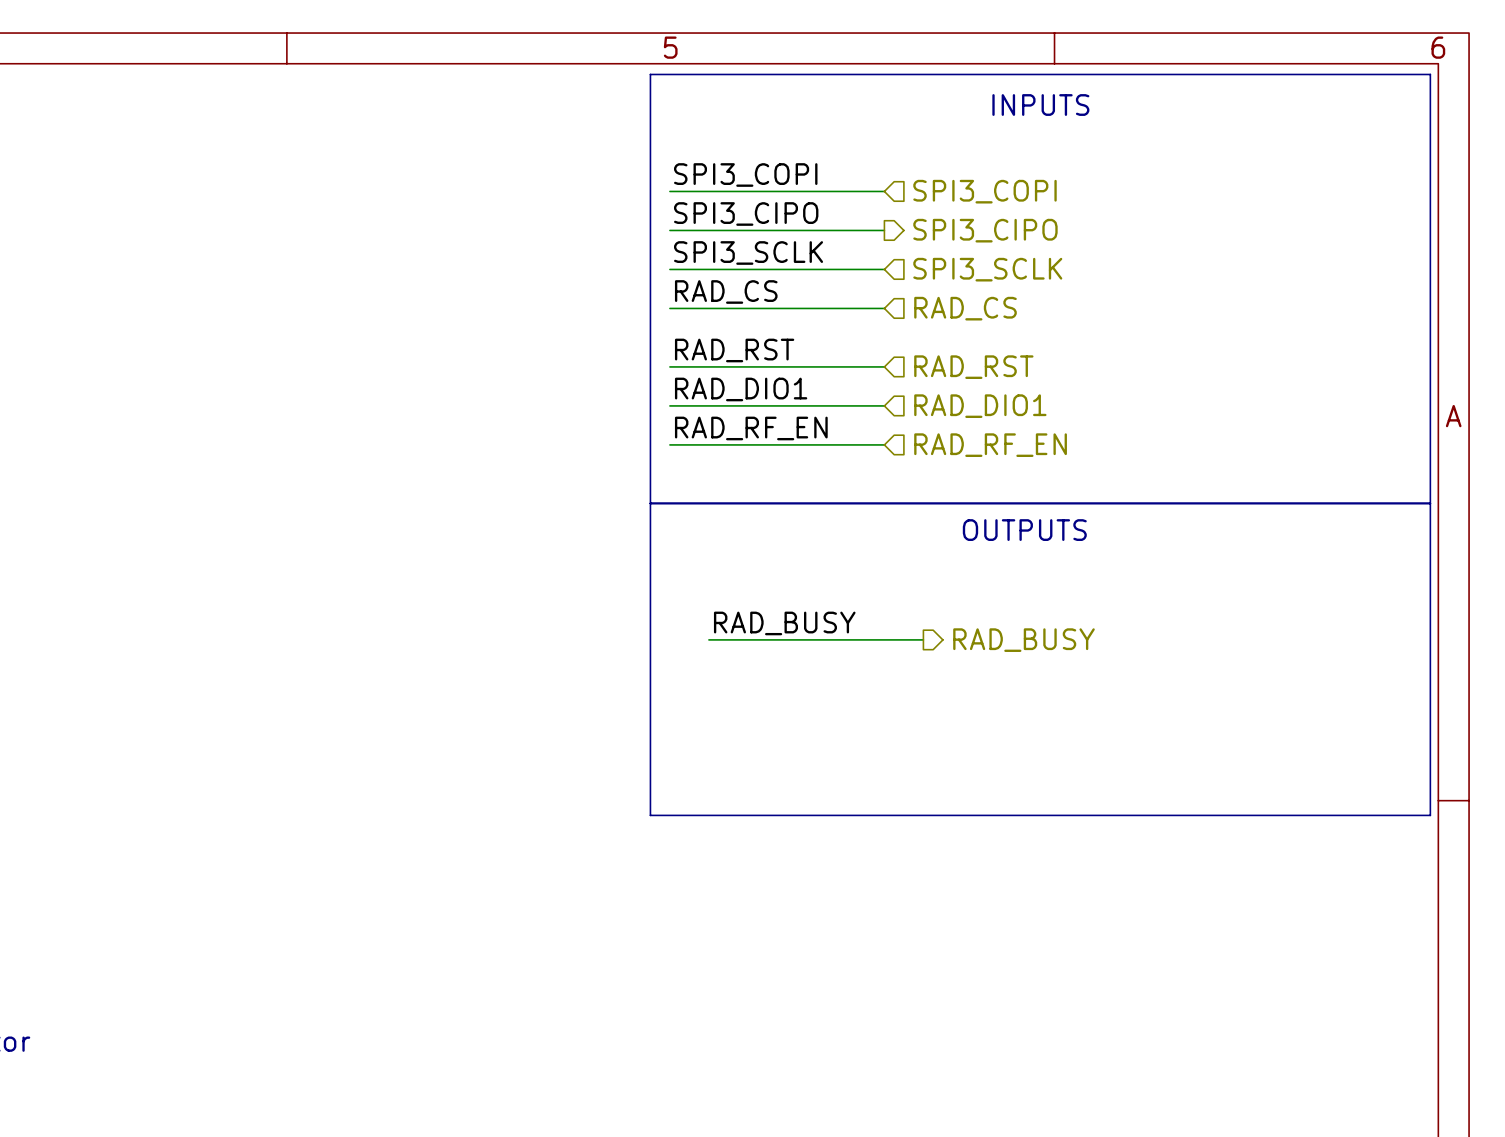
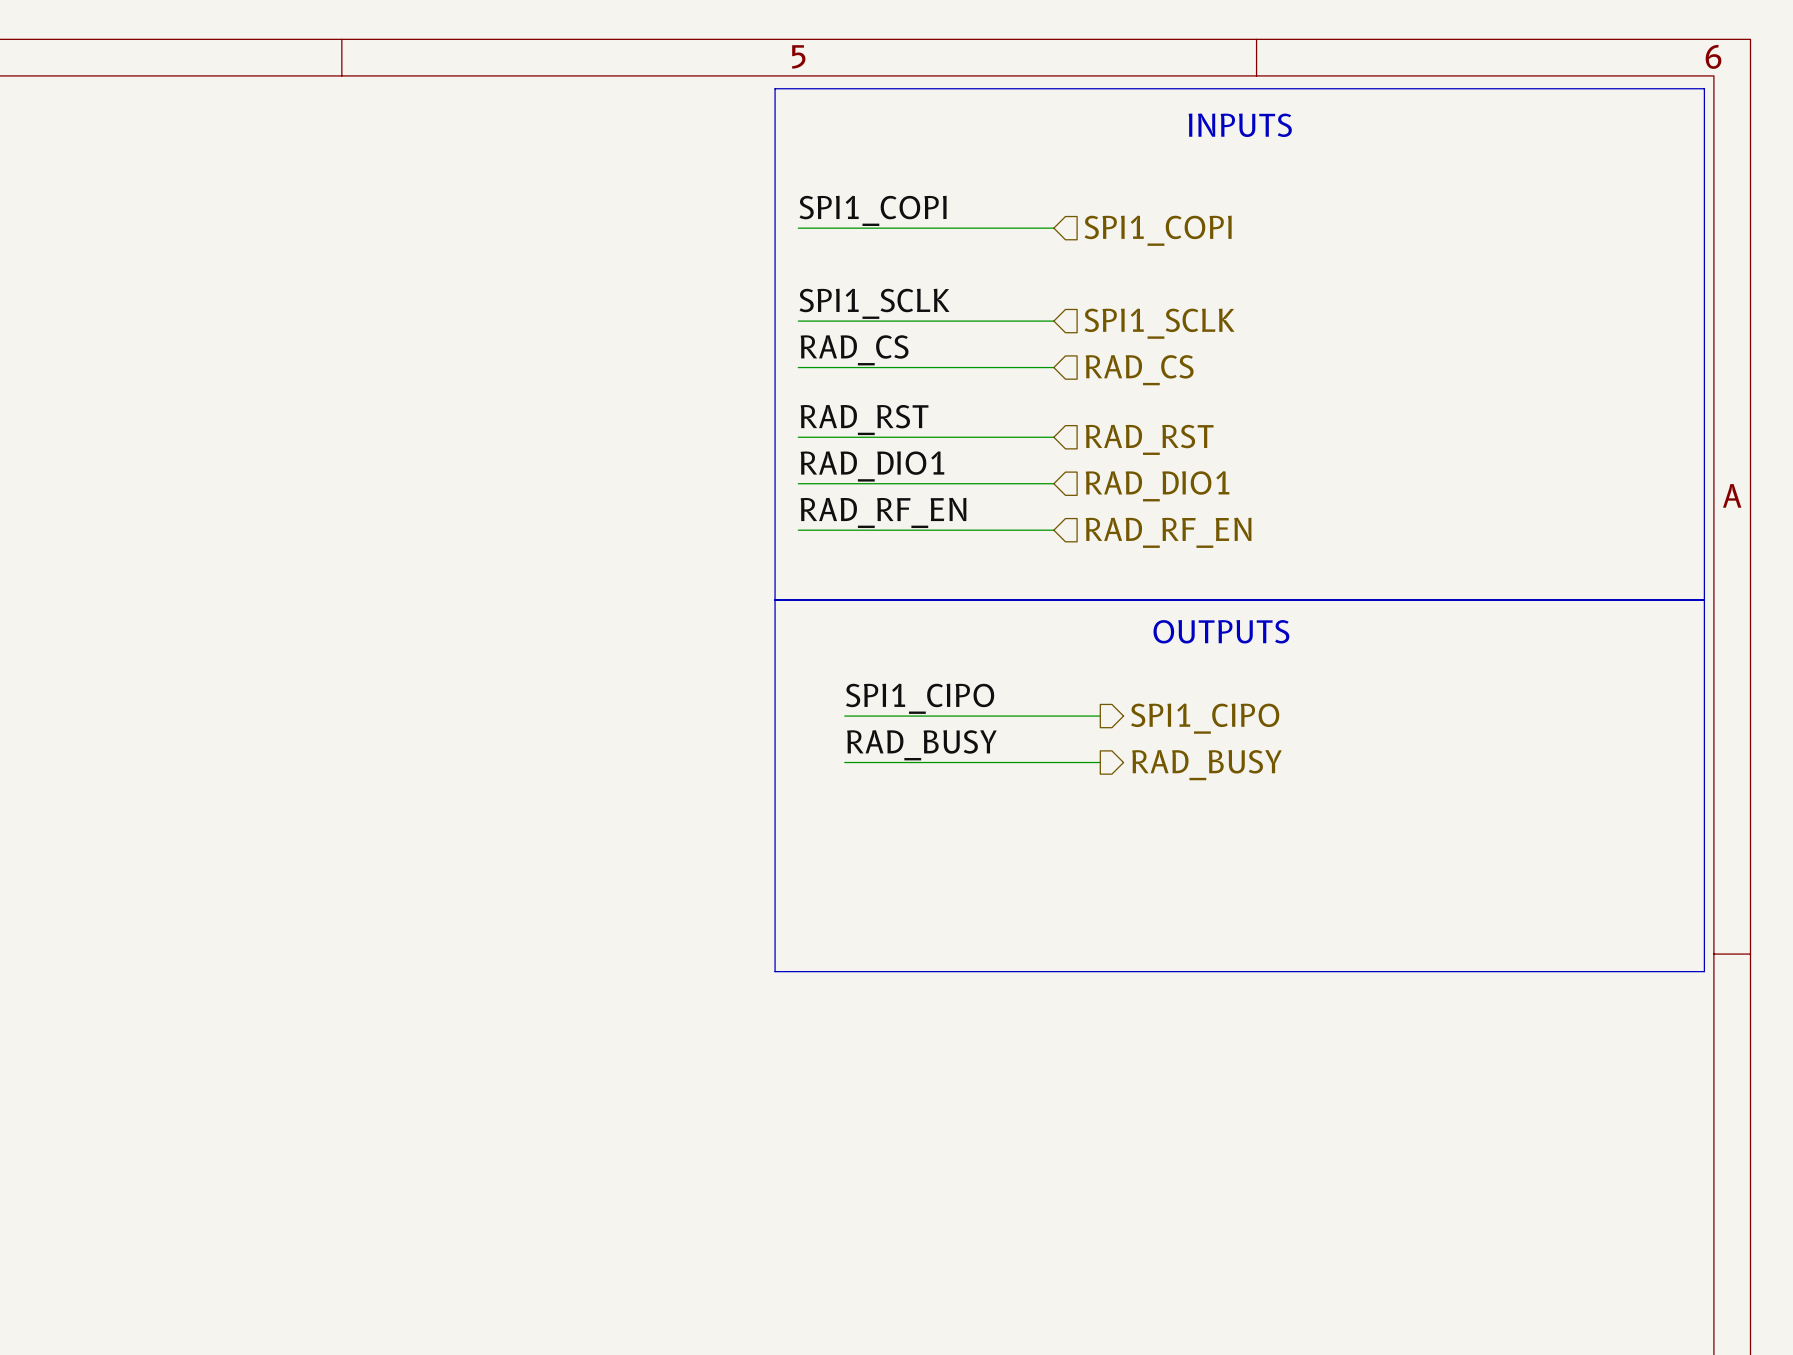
label: SPI3_COPI (745, 175) -> SPI1_COPI (873, 210)
hierarchical label: SPI3_COPI (984, 191) -> SPI1_COPI (1158, 230)
label: SPI3_CIPO (746, 213) -> none
wire: (669, 230) (884, 230) -> (844, 716) (1100, 716)
hierarchical label: SPI3_CIPO (985, 230) -> none
label: SPI3_SCLK (748, 252) -> SPI1_SCLK (874, 303)
hierarchical label: SPI3_SCLK (987, 269) -> SPI1_SCLK (1159, 323)
label: none -> SPI1_CIPO (920, 698)
hierarchical label: none -> SPI1_CIPO (1205, 718)

